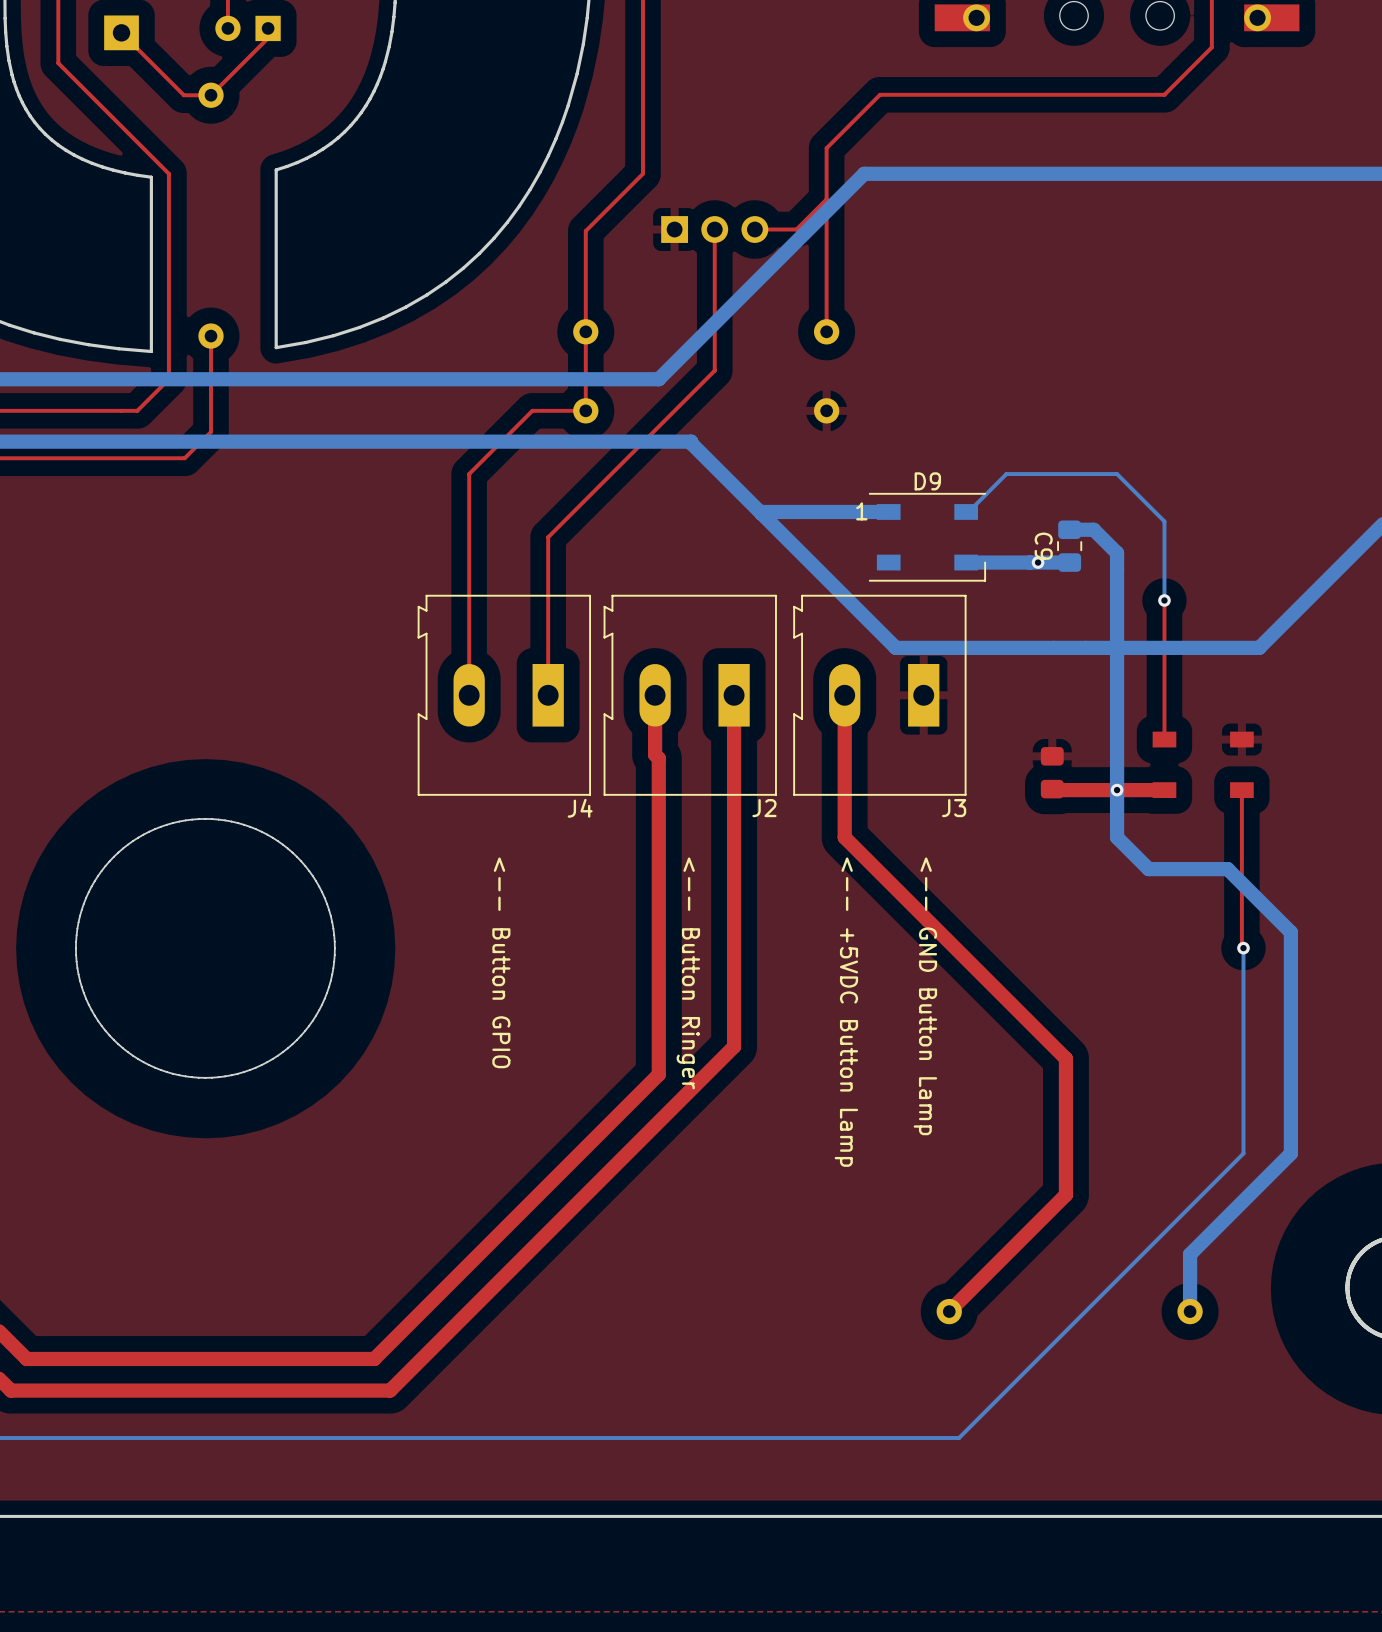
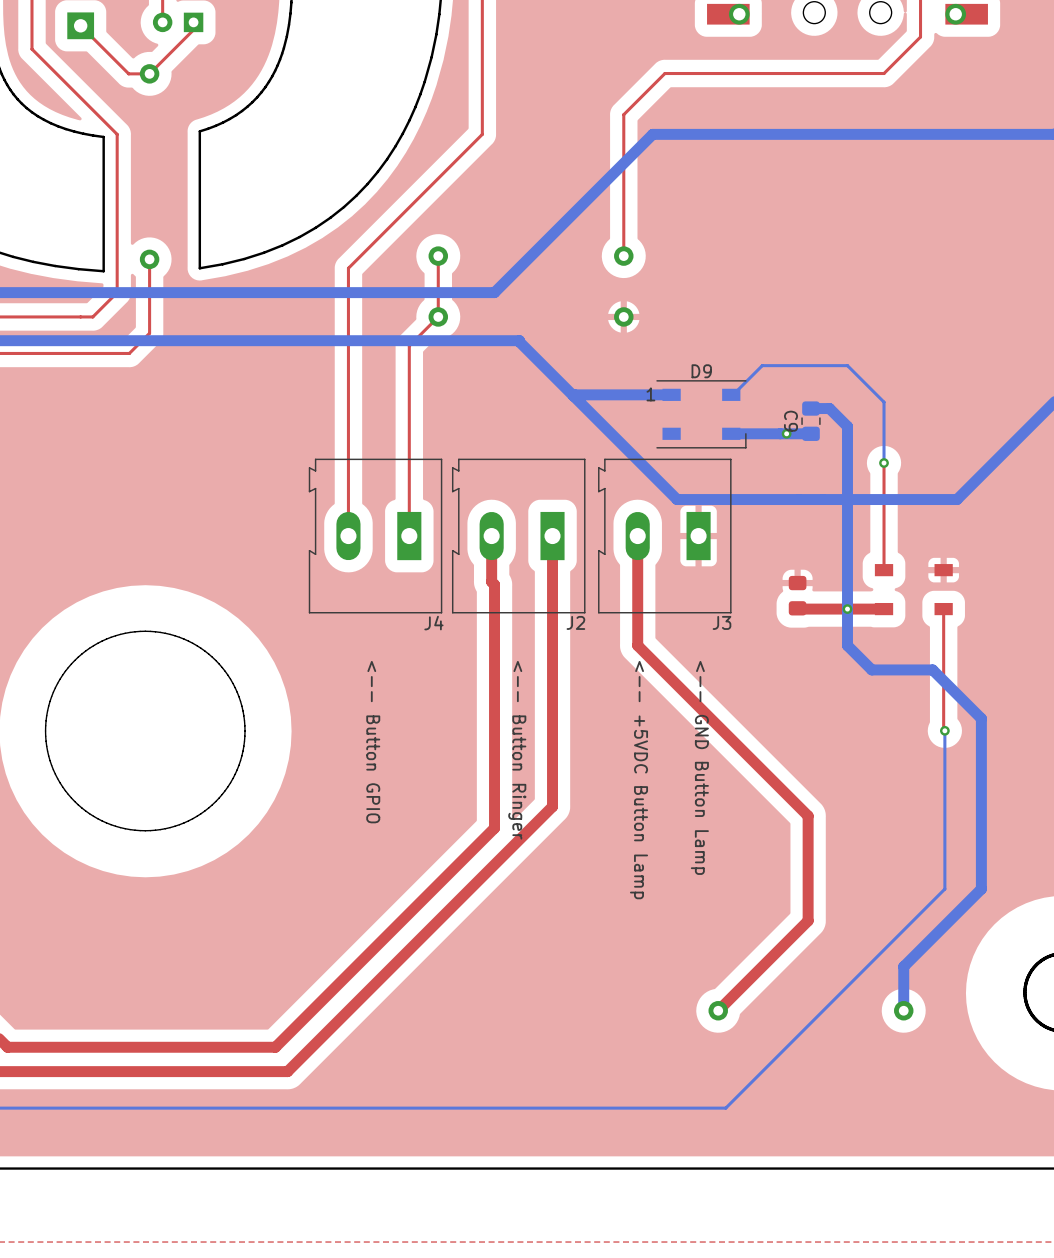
top track: (826, 199) (796, 229) (754, 229) -> none
top track: (714, 229) (714, 370) (548, 537) -> none
part: (714, 229) -> none
top track: (585, 231) (585, 331) -> (438, 178) (348, 268) (348, 365)
top track: (585, 410) (532, 410) (469, 474) -> (438, 316) (409, 345) (409, 414)

